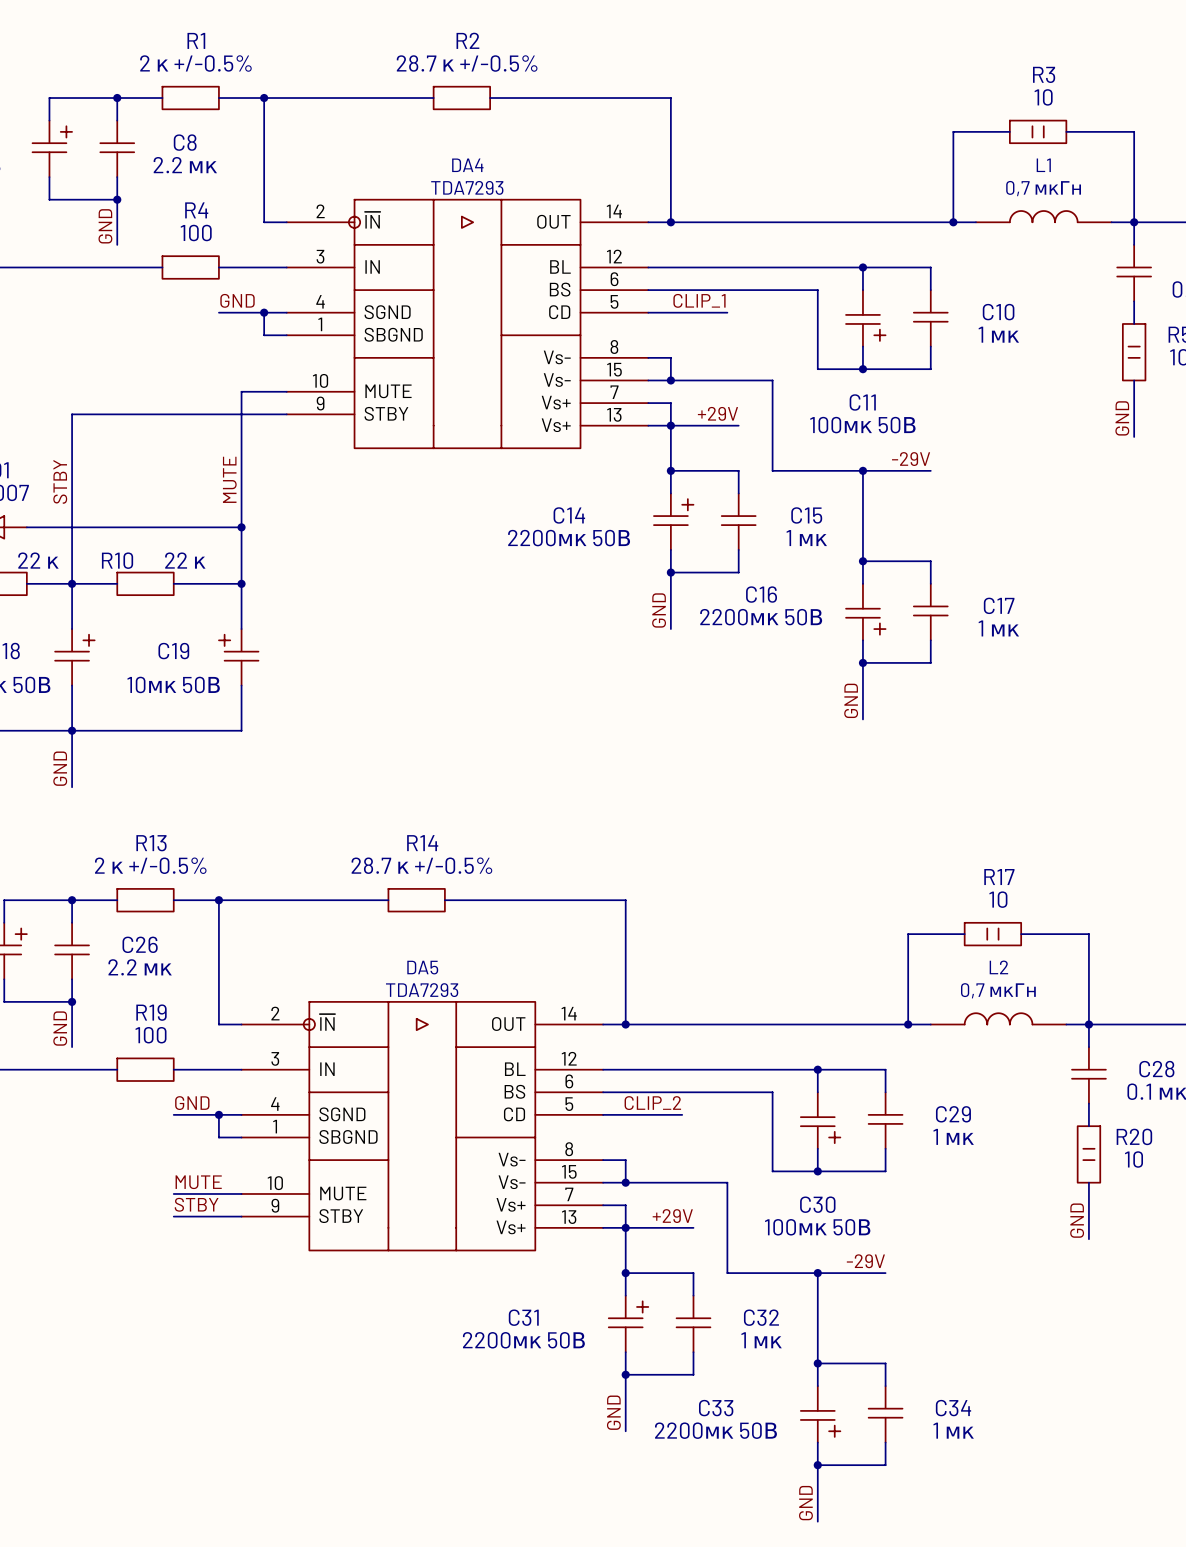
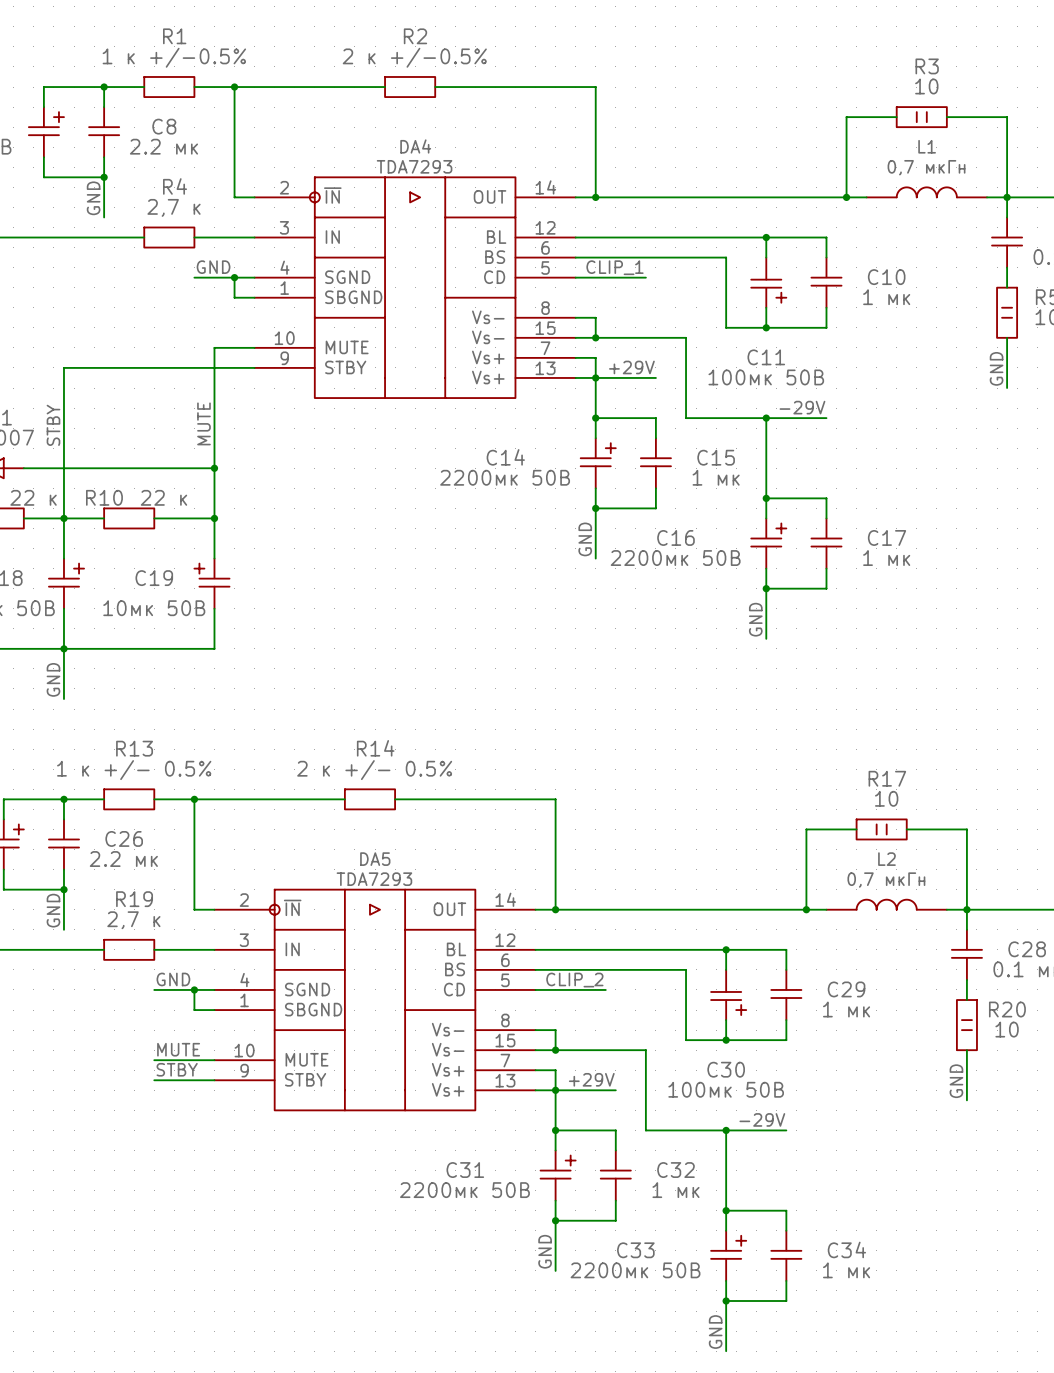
R1 value: 2 к +/-0.5% (195, 63) -> 1 к +/-0.5% (174, 57)
R2 value: 28.7 к +/-0.5% (467, 63) -> 2 к +/-0.5% (414, 57)
R4 value: 100 (196, 233) -> 2,7 к (174, 207)
C16 flip: as is (865, 621) -> up-down (768, 534)
R13 value: 2 к +/-0.5% (150, 865) -> 1 к +/- 0.5% (134, 770)
R14 value: 28.7 к +/-0.5% (421, 865) -> 2 к +/- 0.5% (374, 770)
R19 value: 100 (151, 1035) -> 2,7 к (133, 920)
C33 flip: as is (820, 1423) -> up-down (728, 1247)

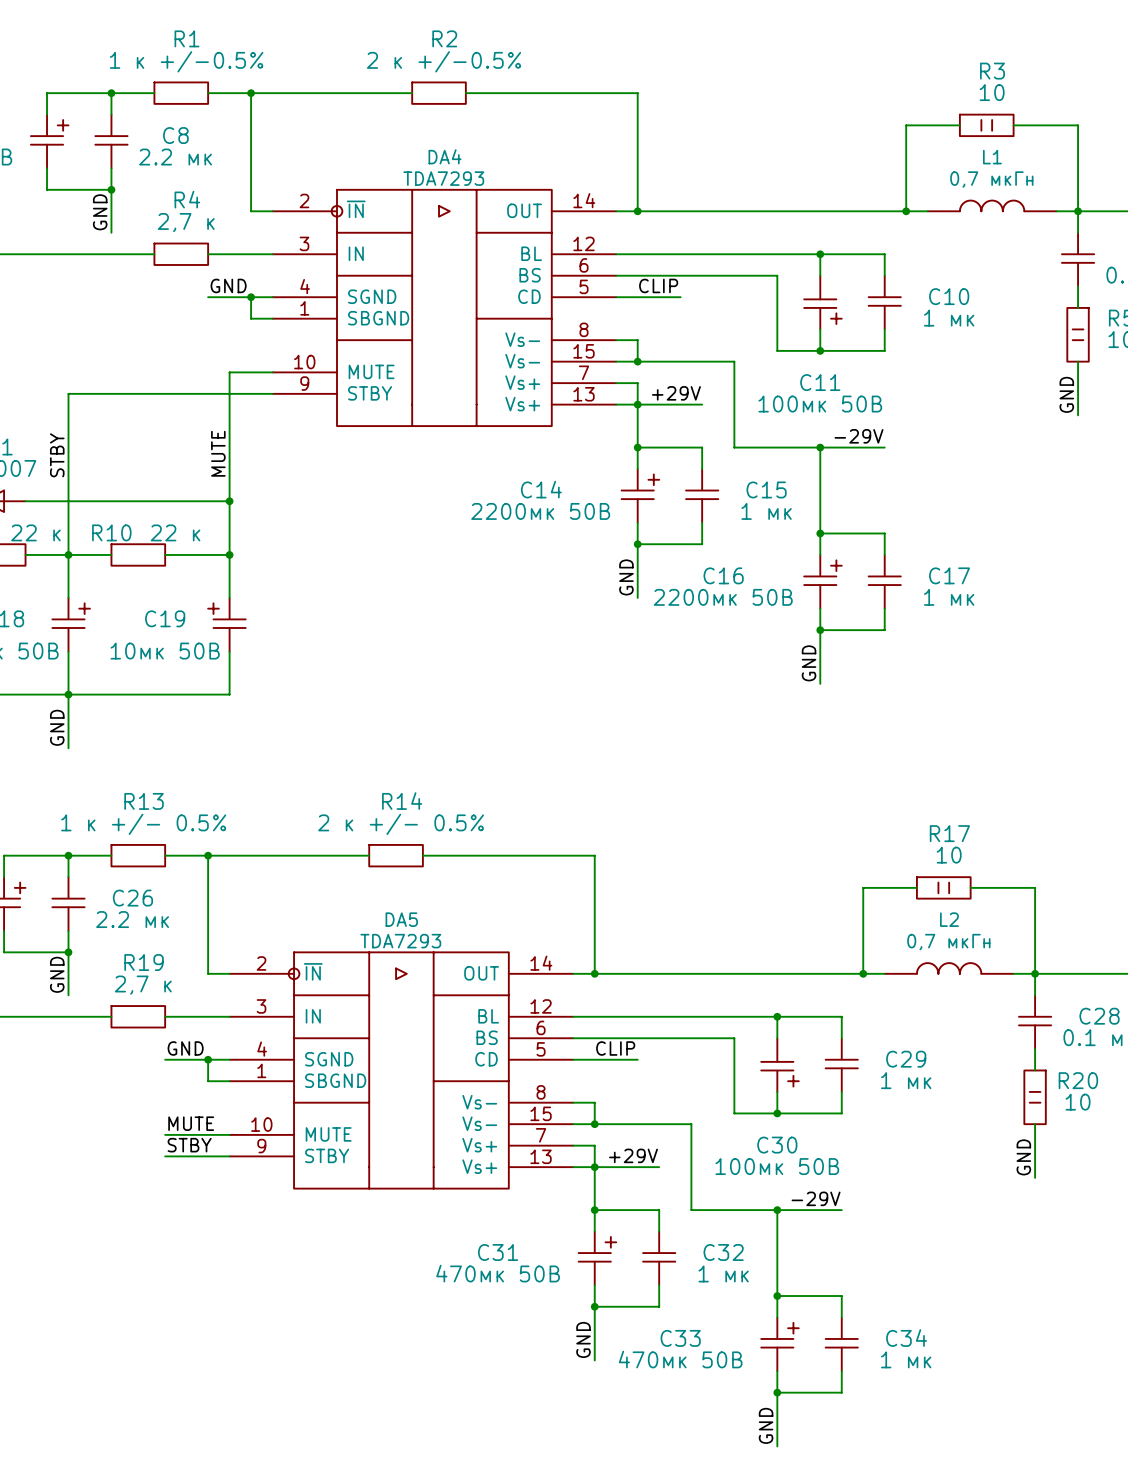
label: CLIP_1 (615, 267) -> CLIP (658, 285)
wire: (635, 277) (645, 277) -> none
label: CLIP_2 (574, 980) -> CLIP (615, 1048)
wire: (595, 989) (605, 989) -> none
C31 value: 2200мк 50В (464, 1190) -> 470мк 50В (498, 1273)
C33 value: 2200мк 50В (635, 1270) -> 470мк 50В (680, 1359)

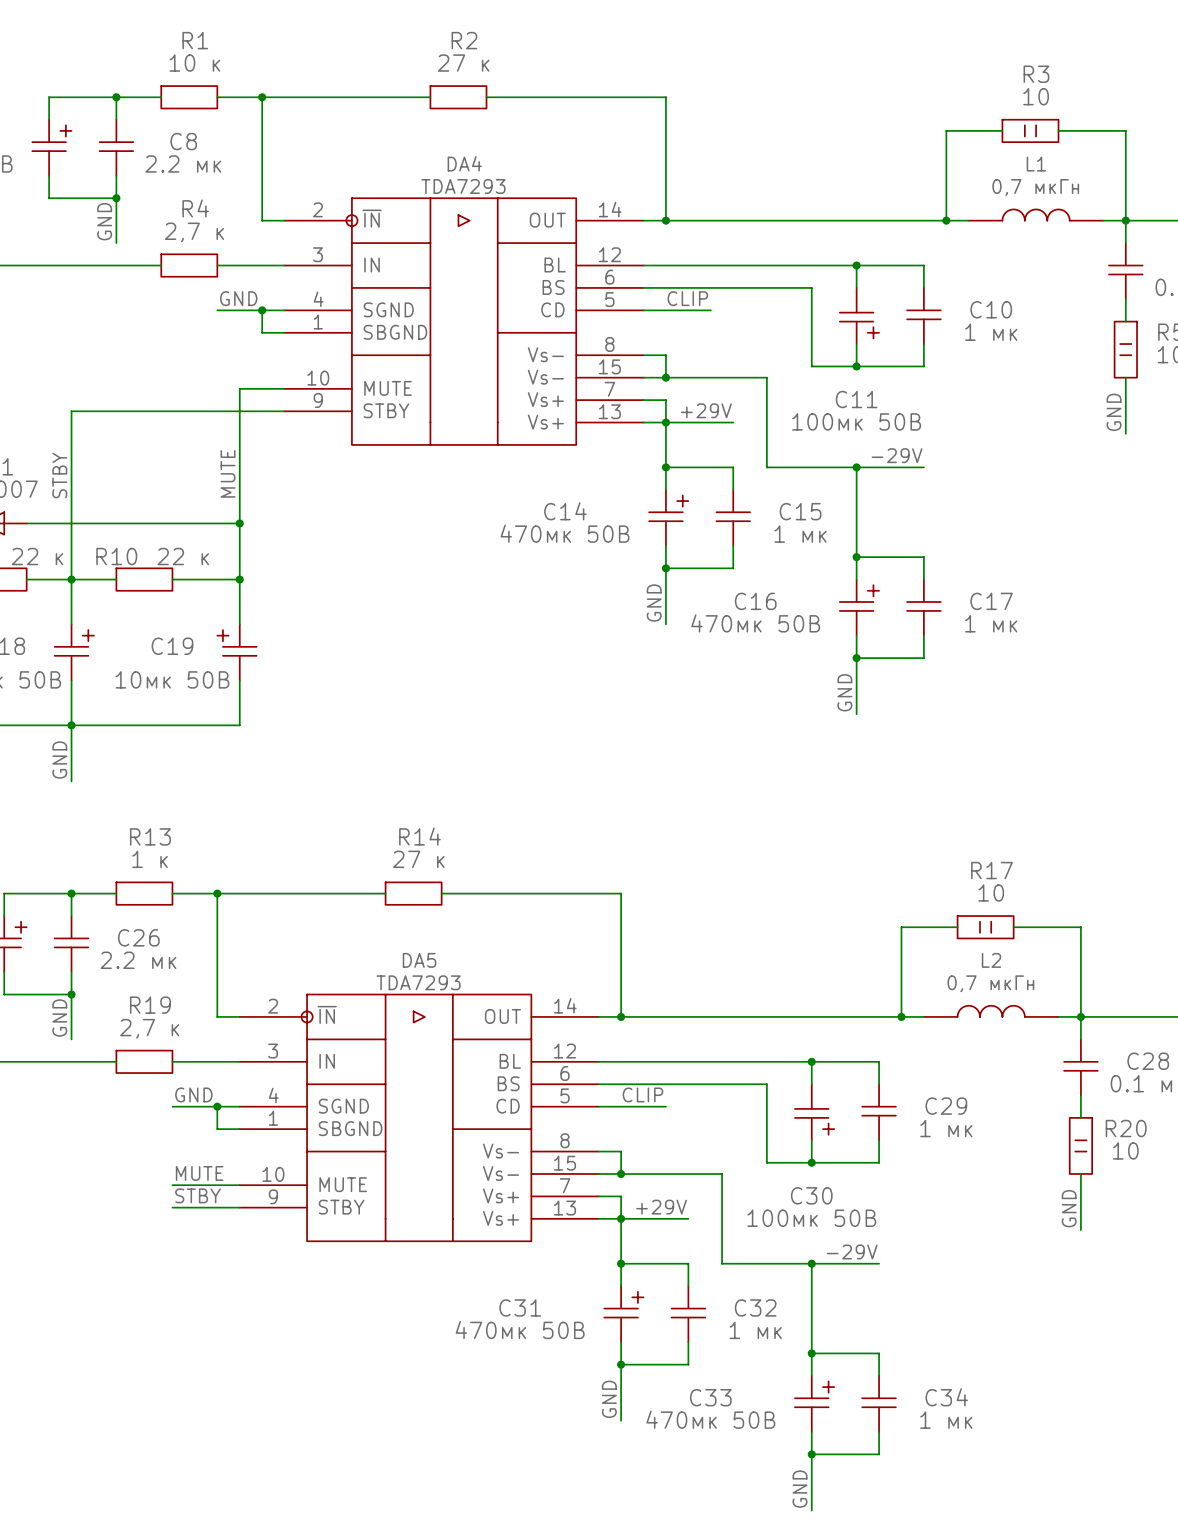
R1 value: 1 к +/-0.5% (186, 61) -> 10 к (194, 63)
R2 value: 2 к +/-0.5% (444, 61) -> 27 к (463, 63)
C14 value: 2200мк 50В (540, 511) -> 470мк 50В (565, 533)
C16 value: 2200мк 50В (723, 597) -> 470мк 50В (755, 623)
R13 value: 1 к +/- 0.5% (143, 824) -> 1 к (150, 859)
R14 value: 2 к +/- 0.5% (401, 824) -> 27 к (418, 859)

